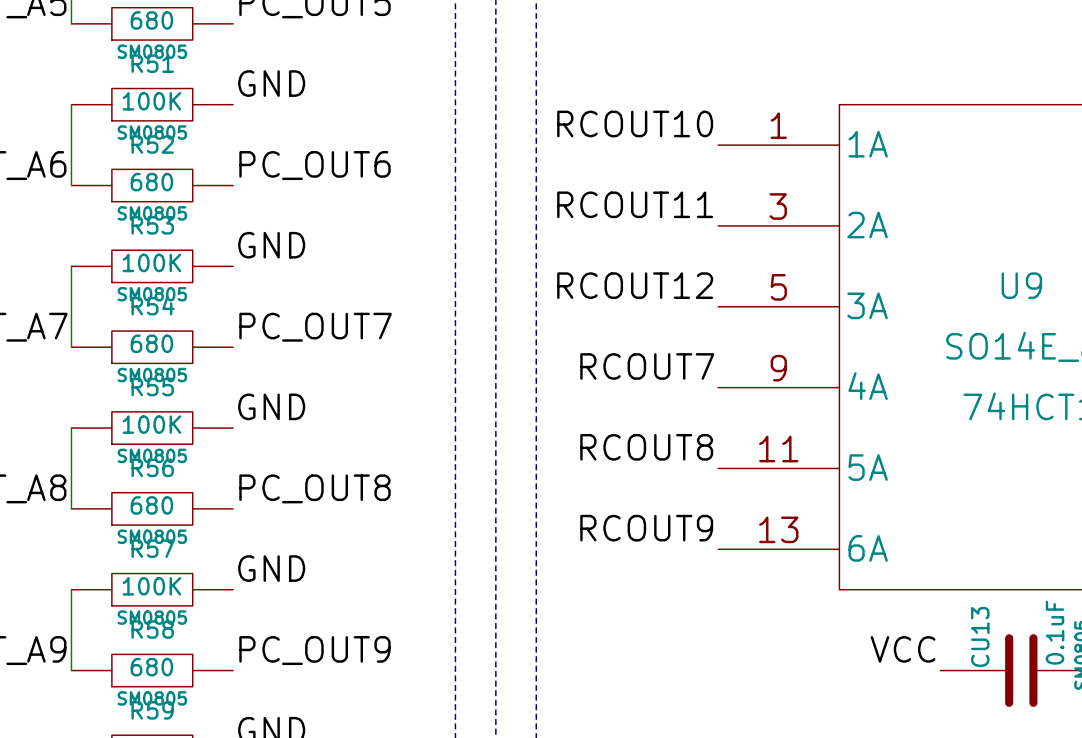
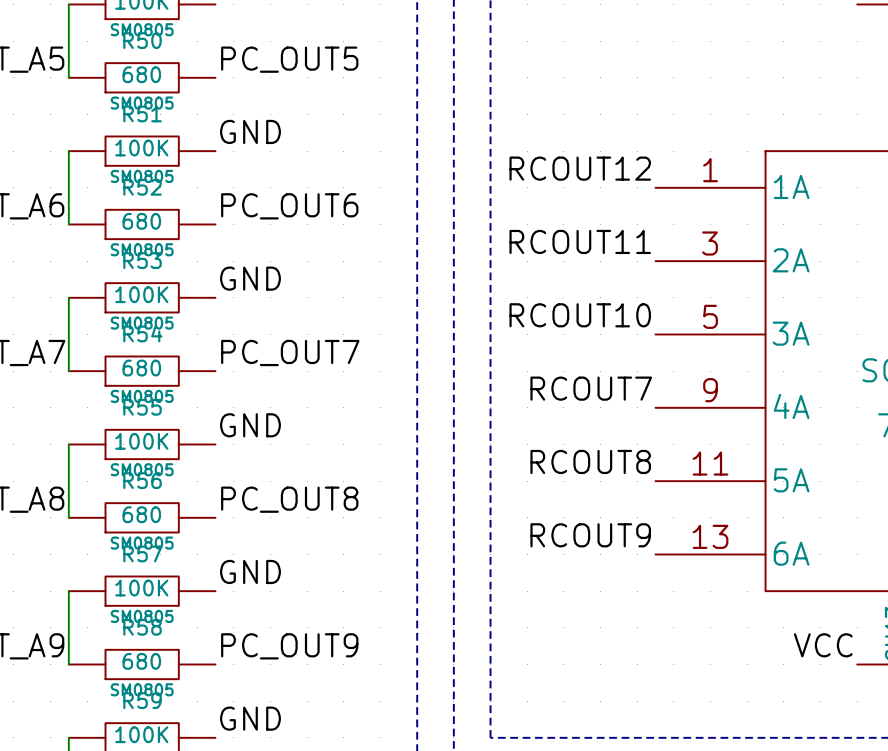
label: RCOUT10 (635, 123) -> RCOUT12 (580, 168)
label: RCOUT12 (635, 285) -> RCOUT10 (580, 315)

